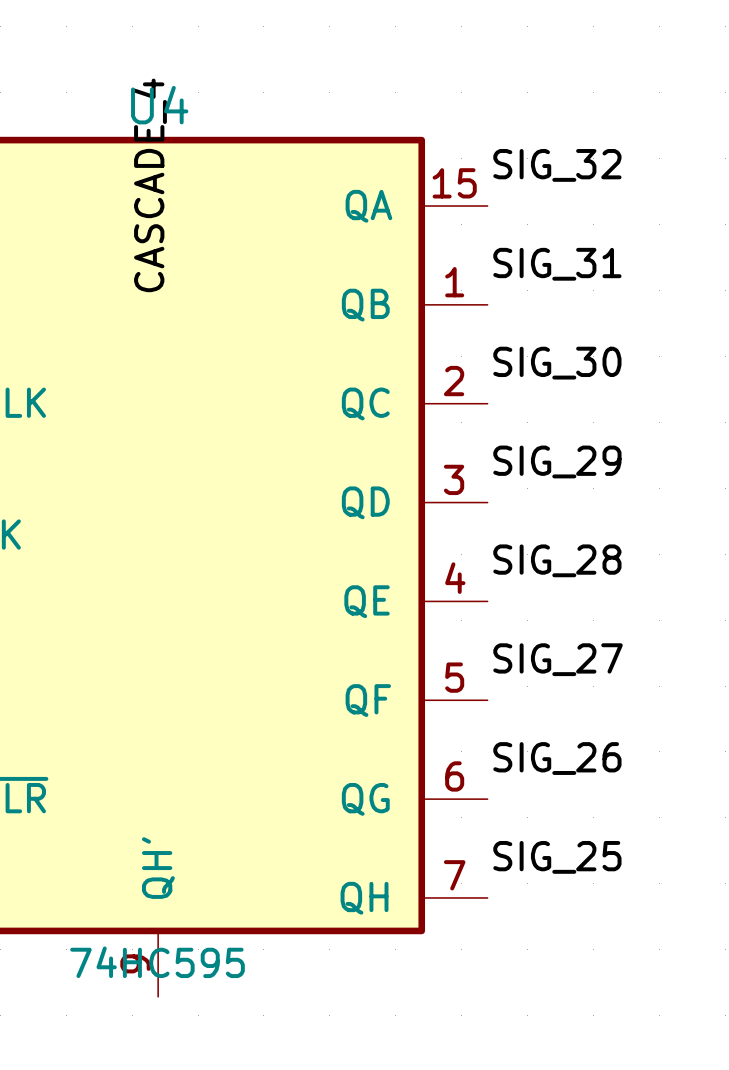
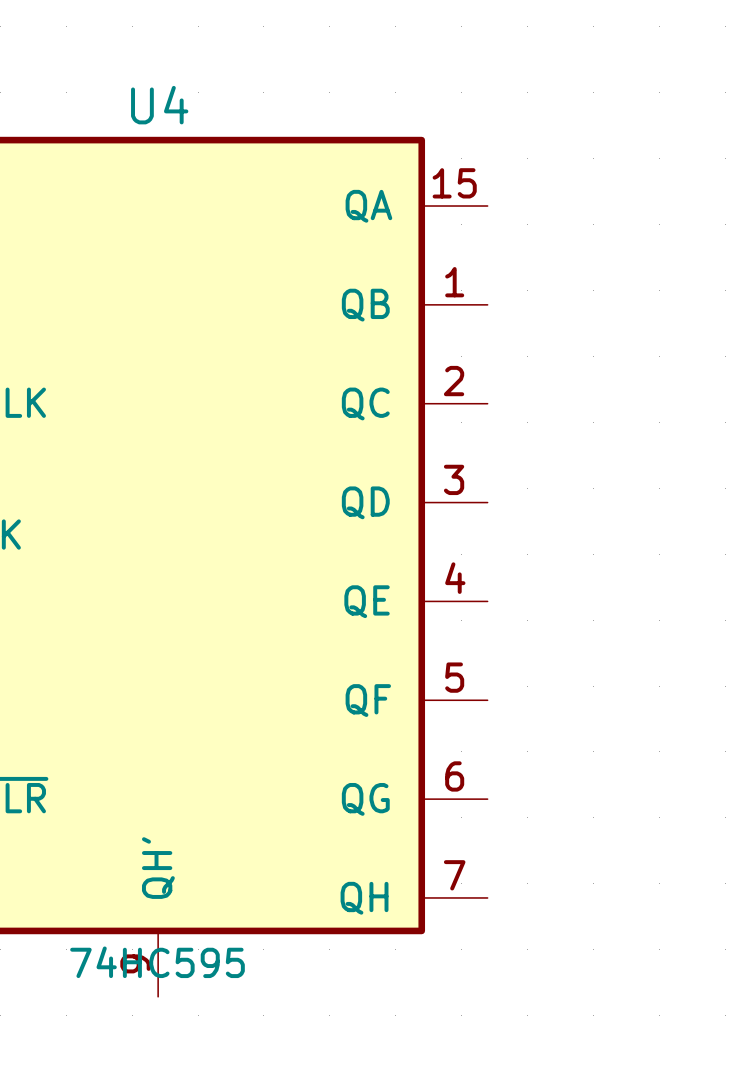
label: SIG_32 (557, 165) -> none
label: CASCADE_4 (149, 185) -> none
label: SIG_31 (557, 264) -> none
label: SIG_30 (557, 363) -> none
label: SIG_29 (557, 461) -> none
label: SIG_28 (557, 560) -> none
label: SIG_27 (558, 659) -> none
label: SIG_26 (557, 758) -> none
label: SIG_25 (557, 857) -> none

